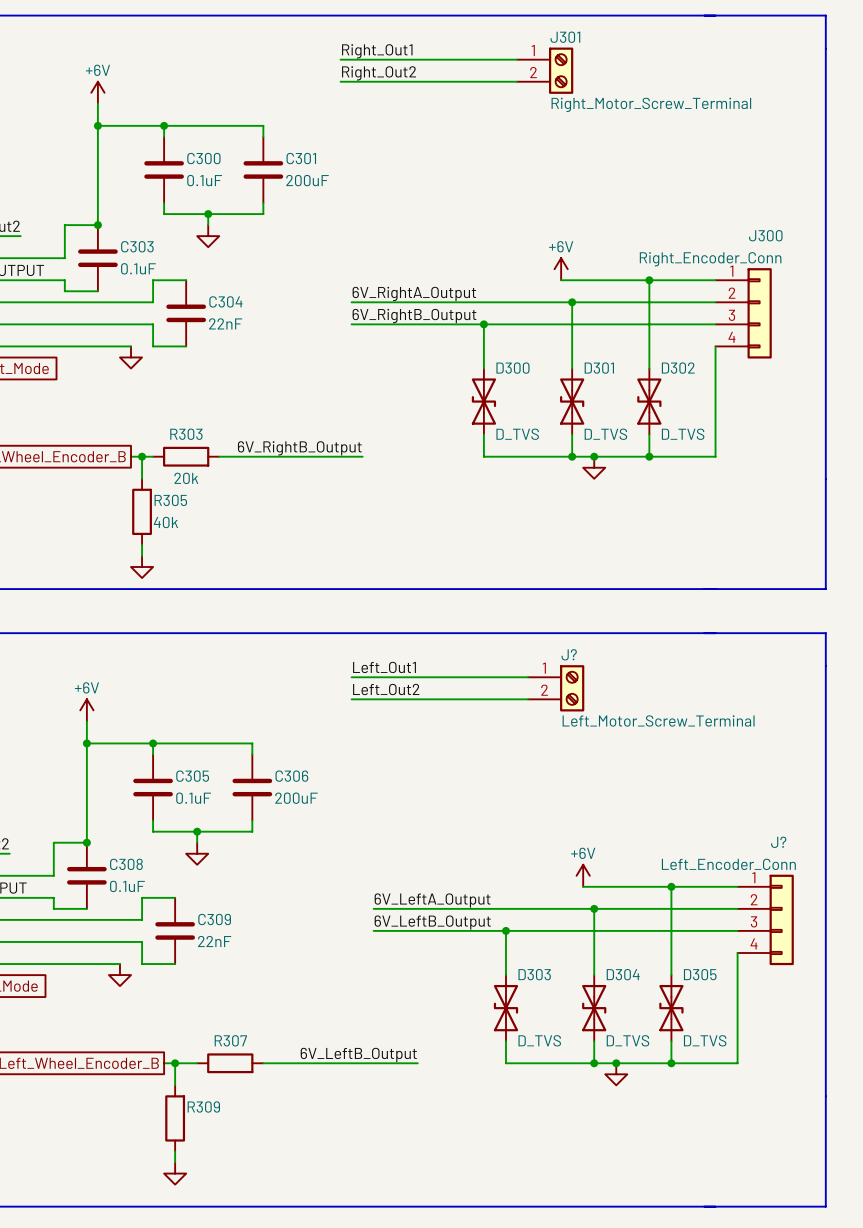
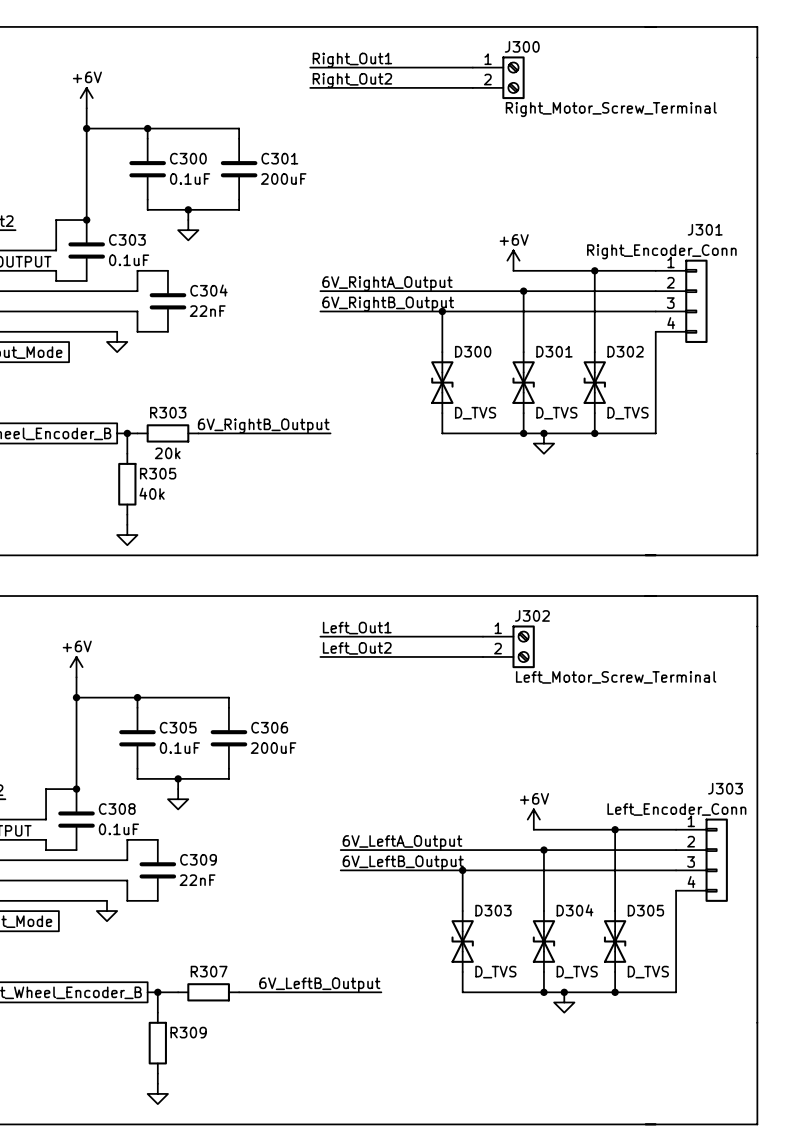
J301 name: J301 (565, 37) -> J300 (522, 46)
J300 name: J300 (765, 235) -> J301 (705, 229)
J? name: J? (569, 654) -> J302 (532, 615)
J? name: J? (778, 842) -> J303 (725, 788)

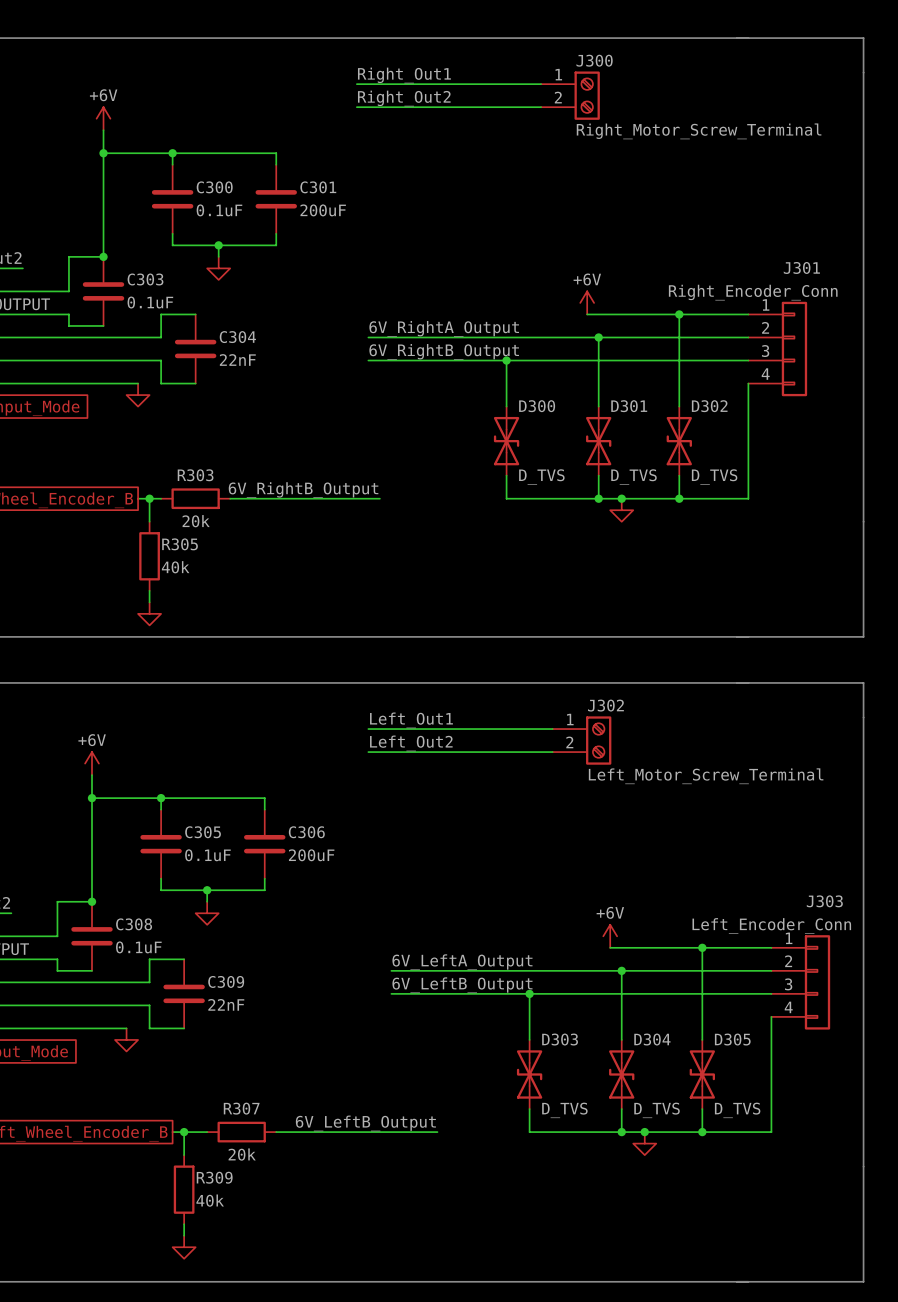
R307 value: none -> 20k (242, 1154)
R309 value: none -> 40k (210, 1200)

